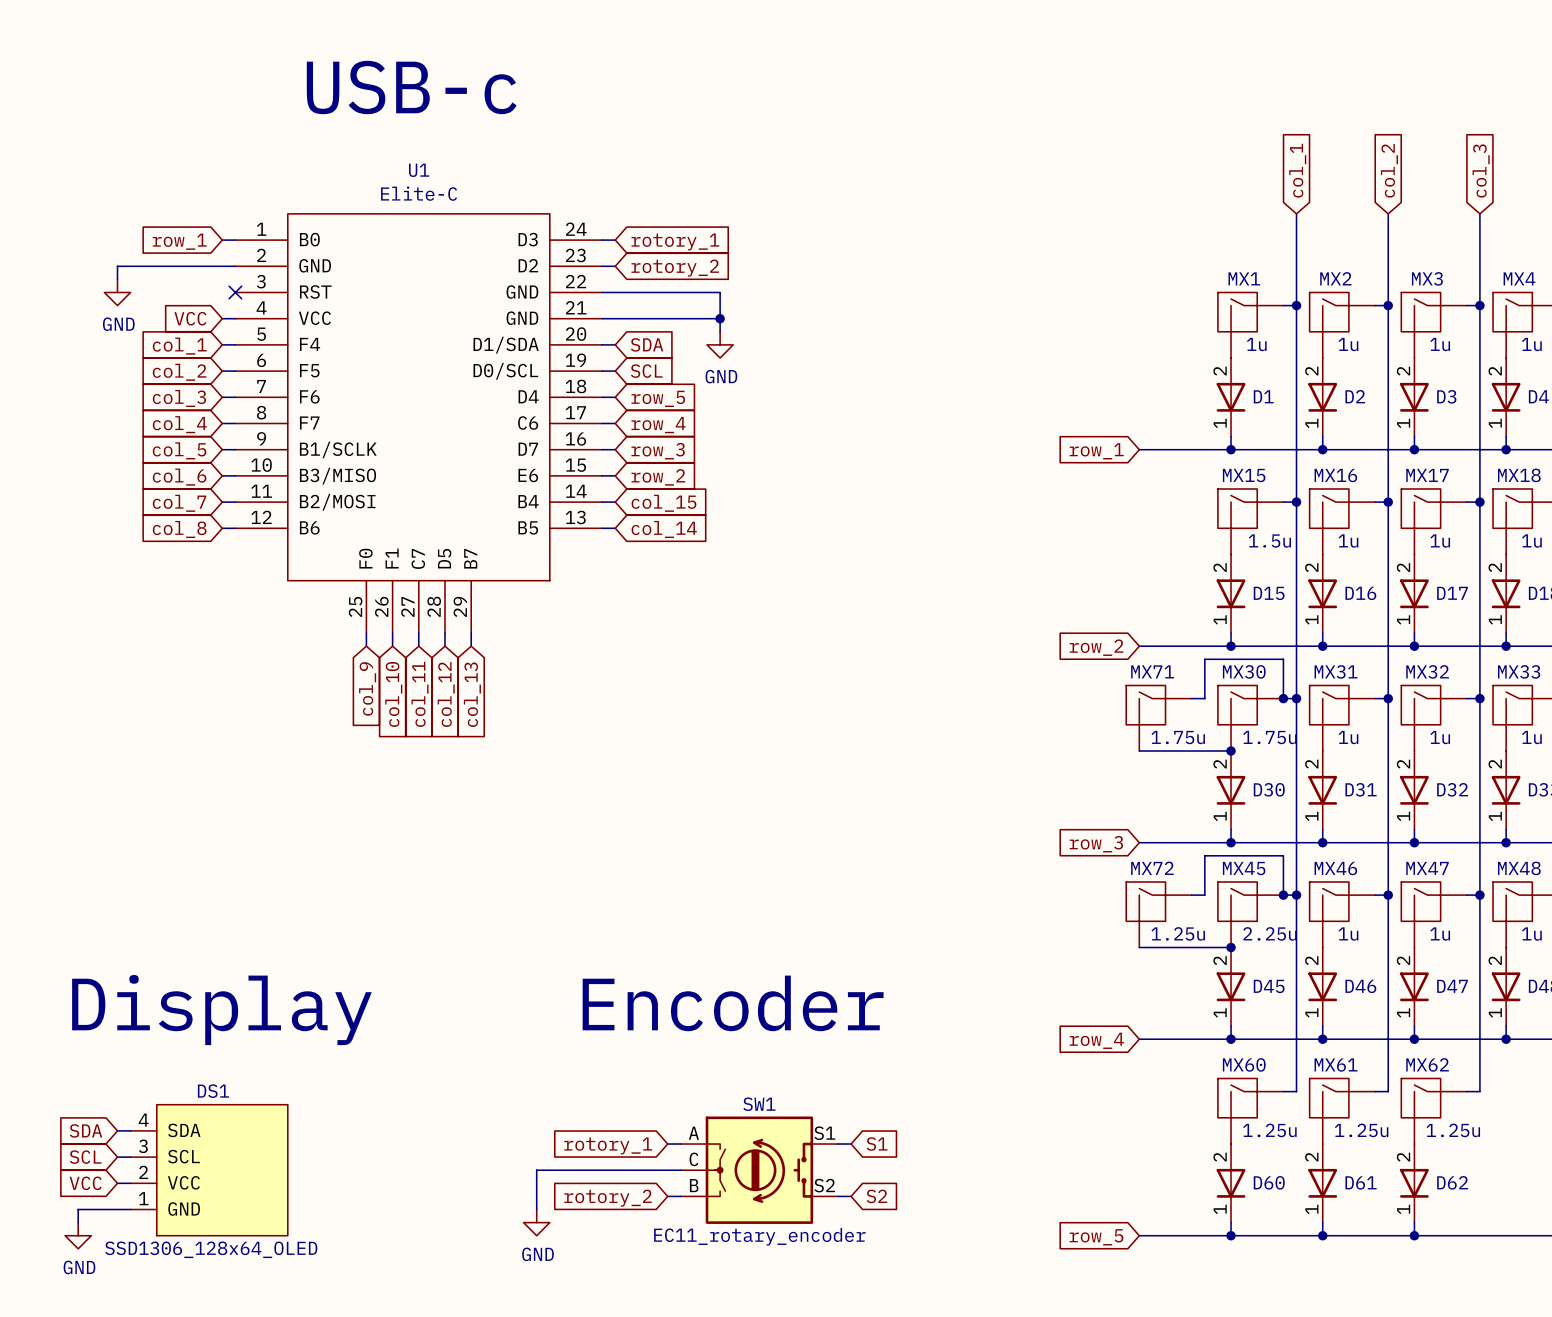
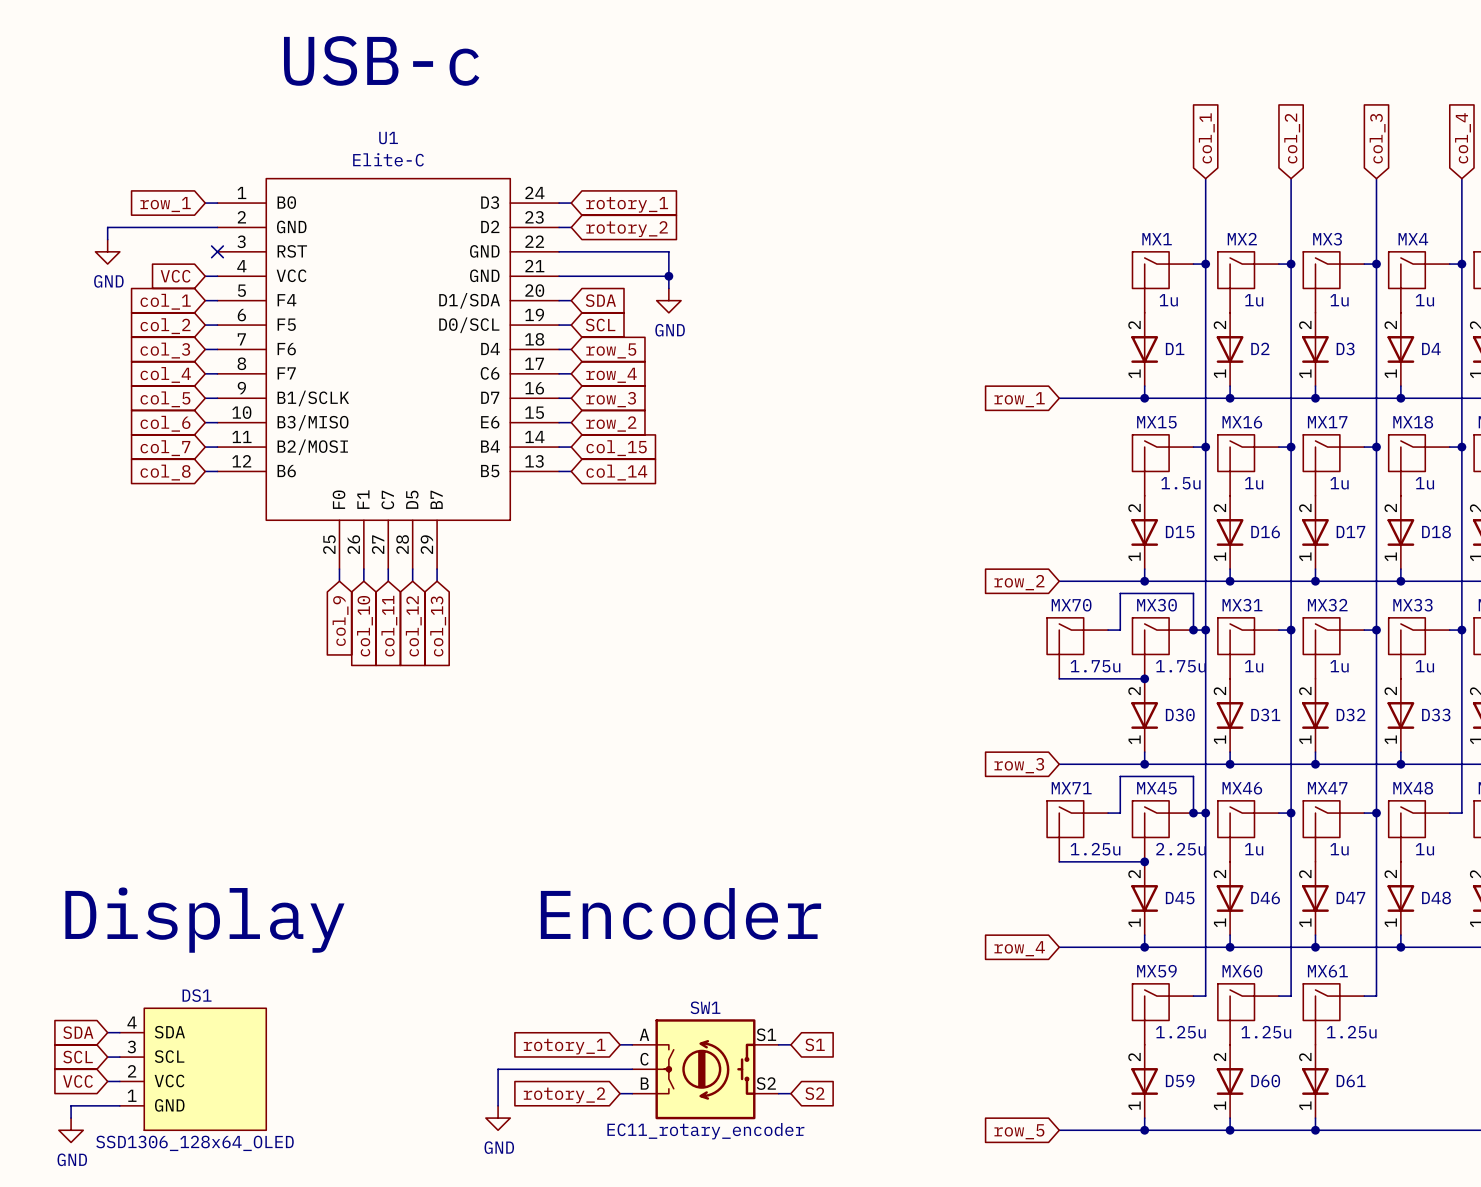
MX71 name: MX71 (1152, 671) -> MX70 (1071, 605)
MX72 name: MX72 (1152, 868) -> MX71 (1071, 788)
MX60 name: MX60 (1244, 1064) -> MX59 (1156, 971)
MX62 name: MX62 (1427, 1064) -> MX61 (1327, 971)
MX61 name: MX61 (1336, 1065) -> MX60 (1242, 971)
D60 name: D60 (1269, 1182) -> D59 (1180, 1081)
D61 name: D61 (1361, 1182) -> D60 (1265, 1081)
D62 name: D62 (1452, 1182) -> D61 (1351, 1081)

